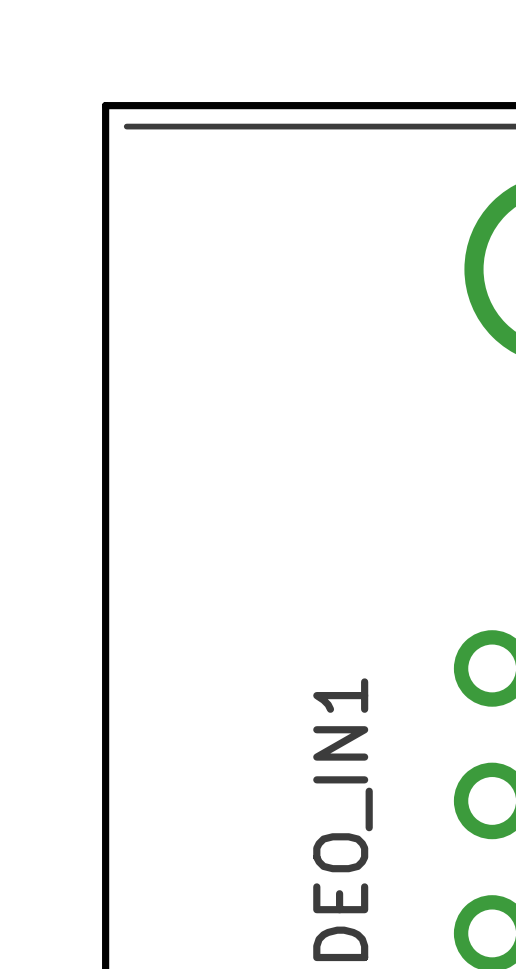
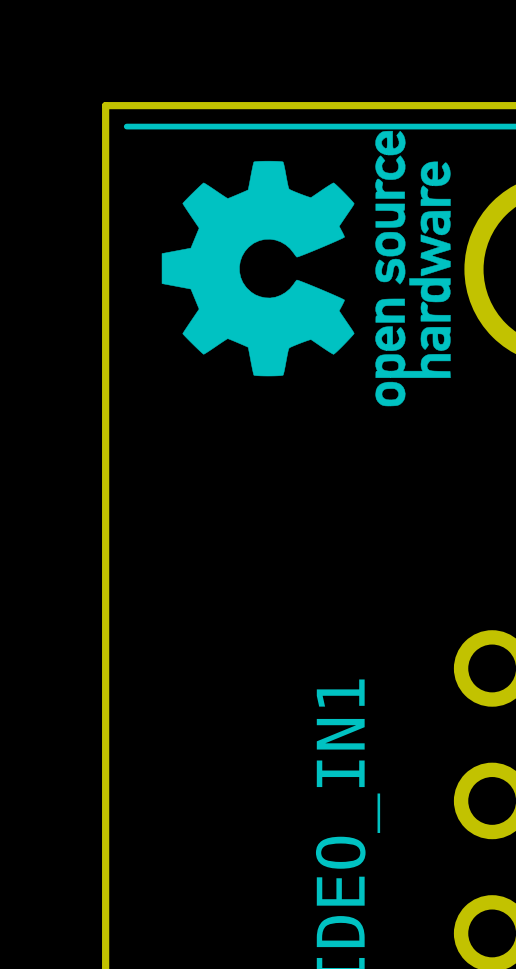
drawing: none -> [161, 130, 451, 407]

